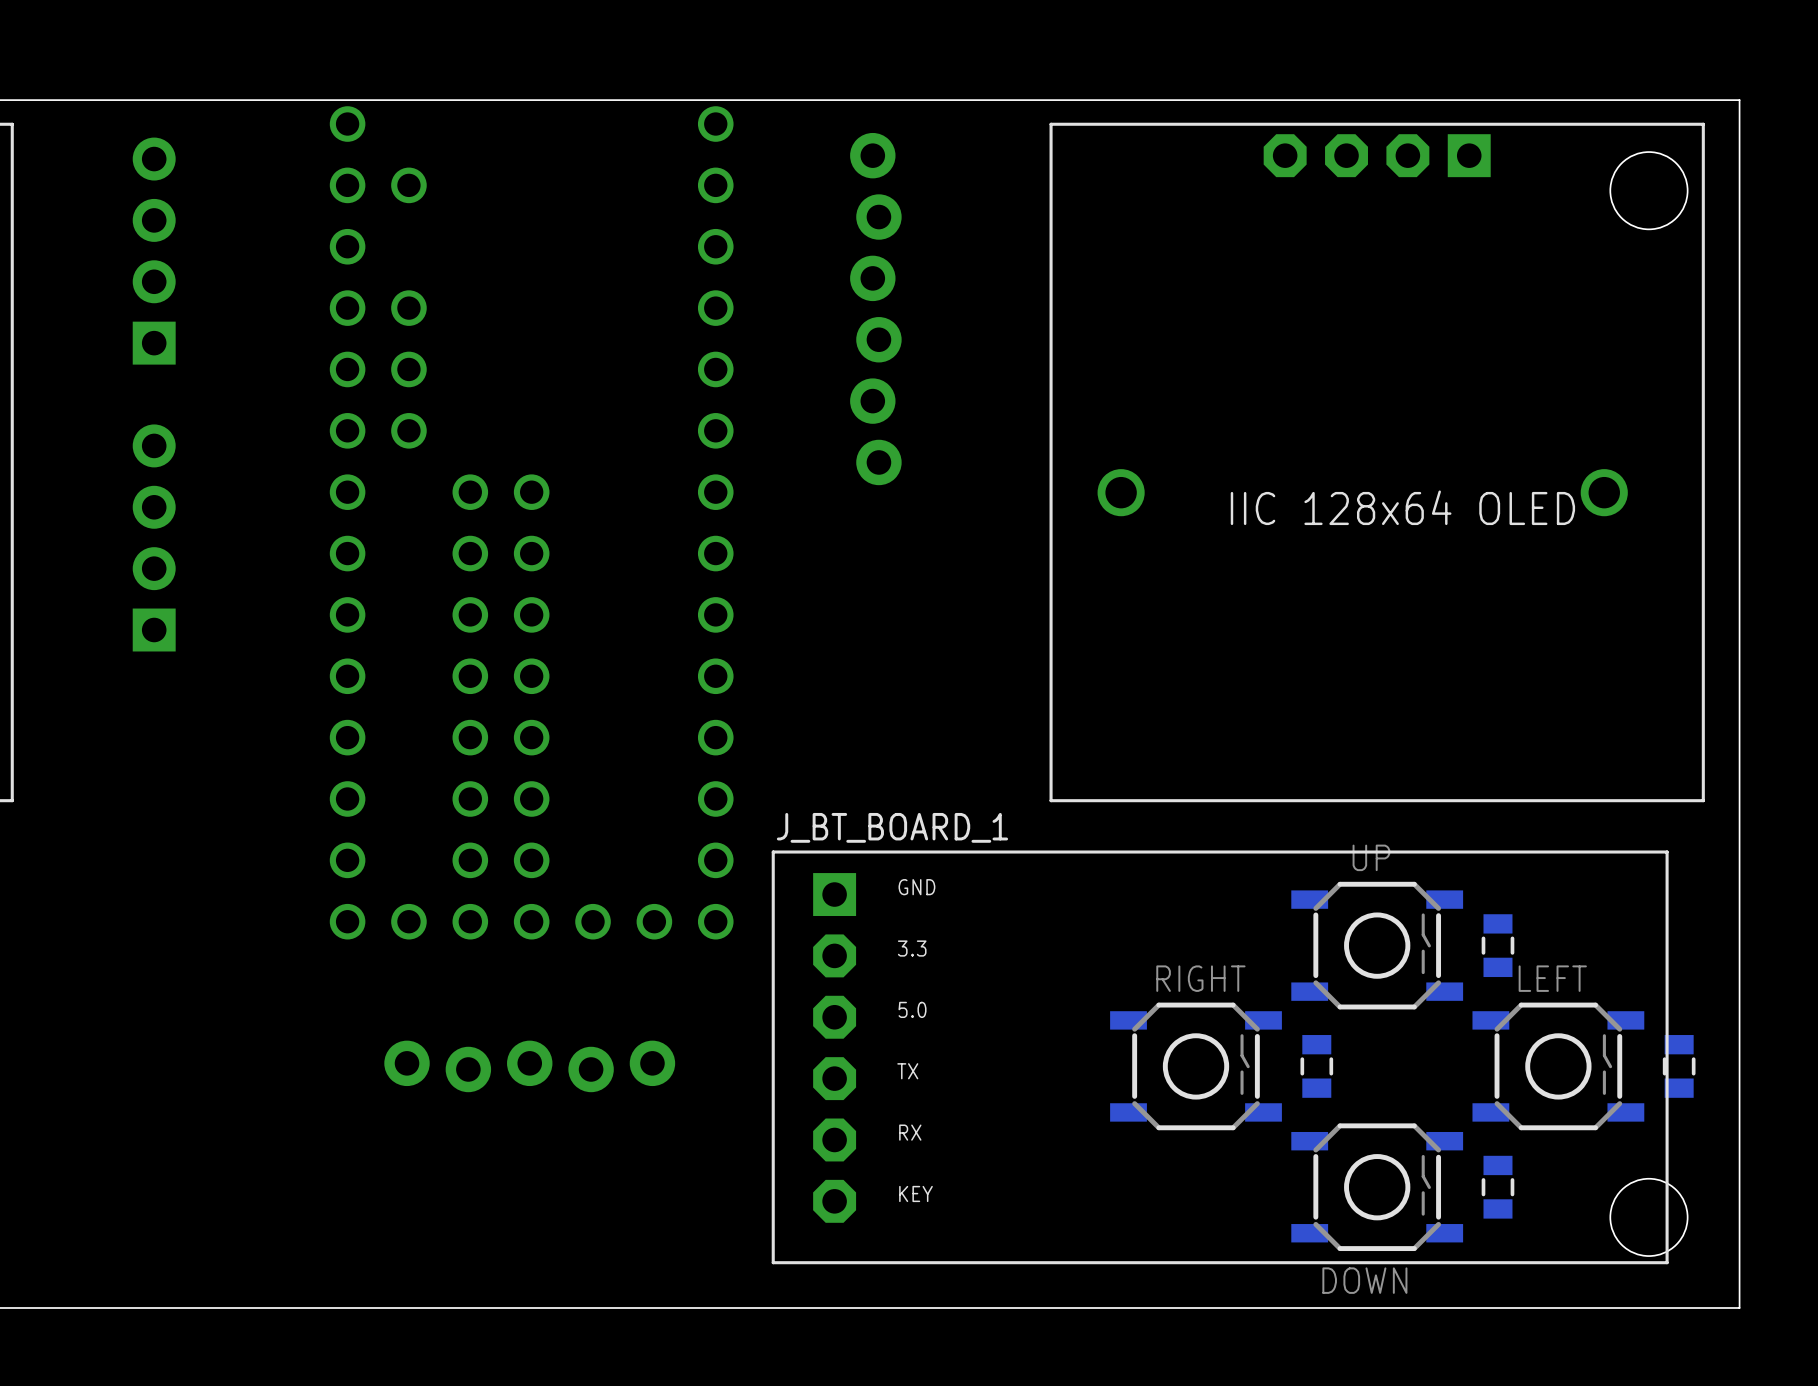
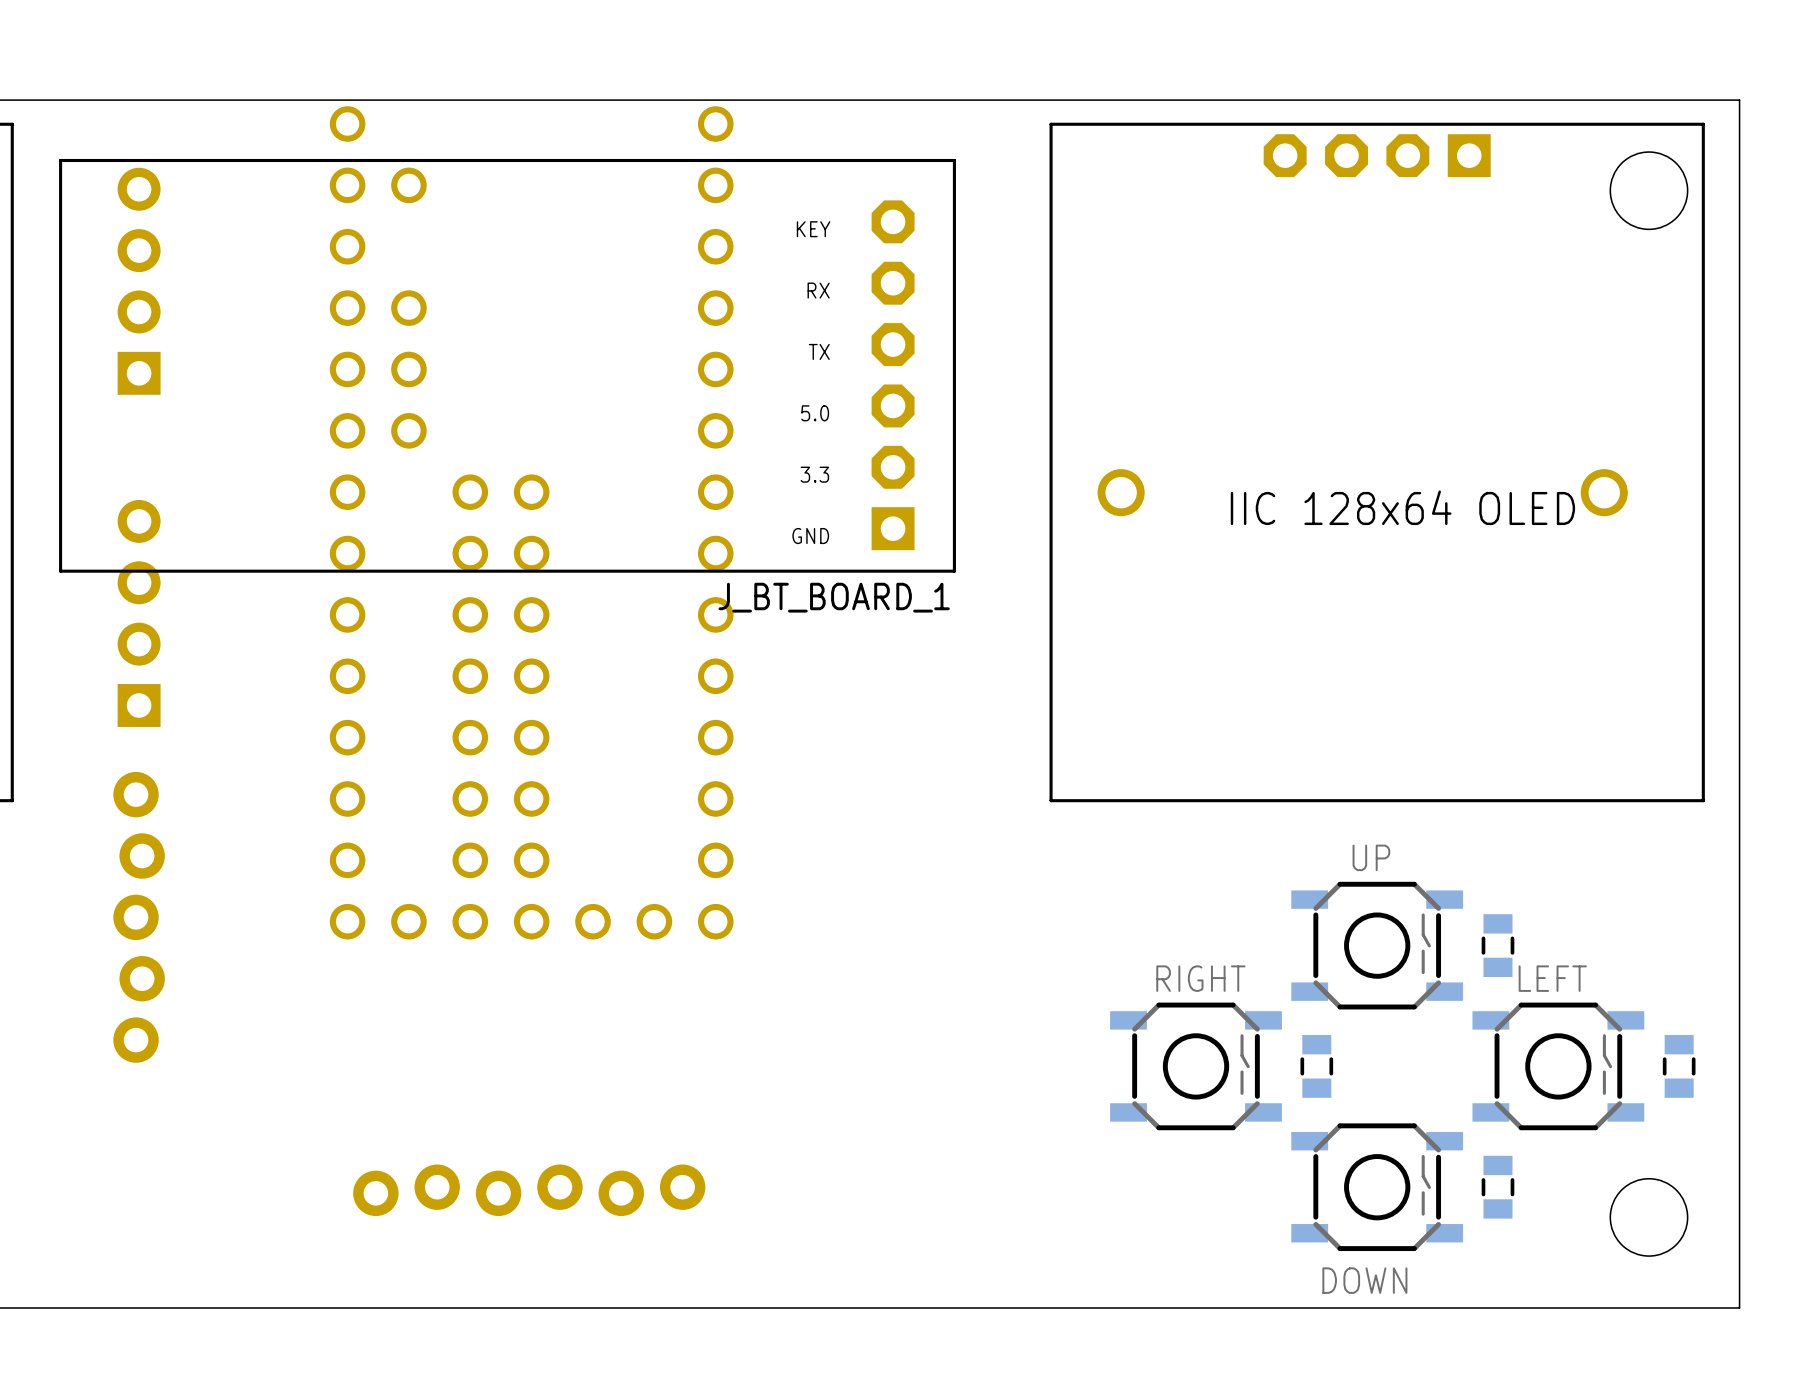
part position: (154, 251) -> (139, 281)
part: (875, 309) -> none
part position: (154, 537) -> (139, 613)
J_BT_BOARD_1 name position: J_BT_BOARD_1 (892, 827) -> J_BT_BOARD_1 (834, 597)
J_BT_BOARD_1 footprint: [771, 850, 1669, 1265] -> [59, 158, 956, 573]
part rotation: 0° (529, 1066) -> 90° counterclockwise (139, 917)
part position: (529, 1066) -> (139, 917)
part: none -> (529, 1190)

